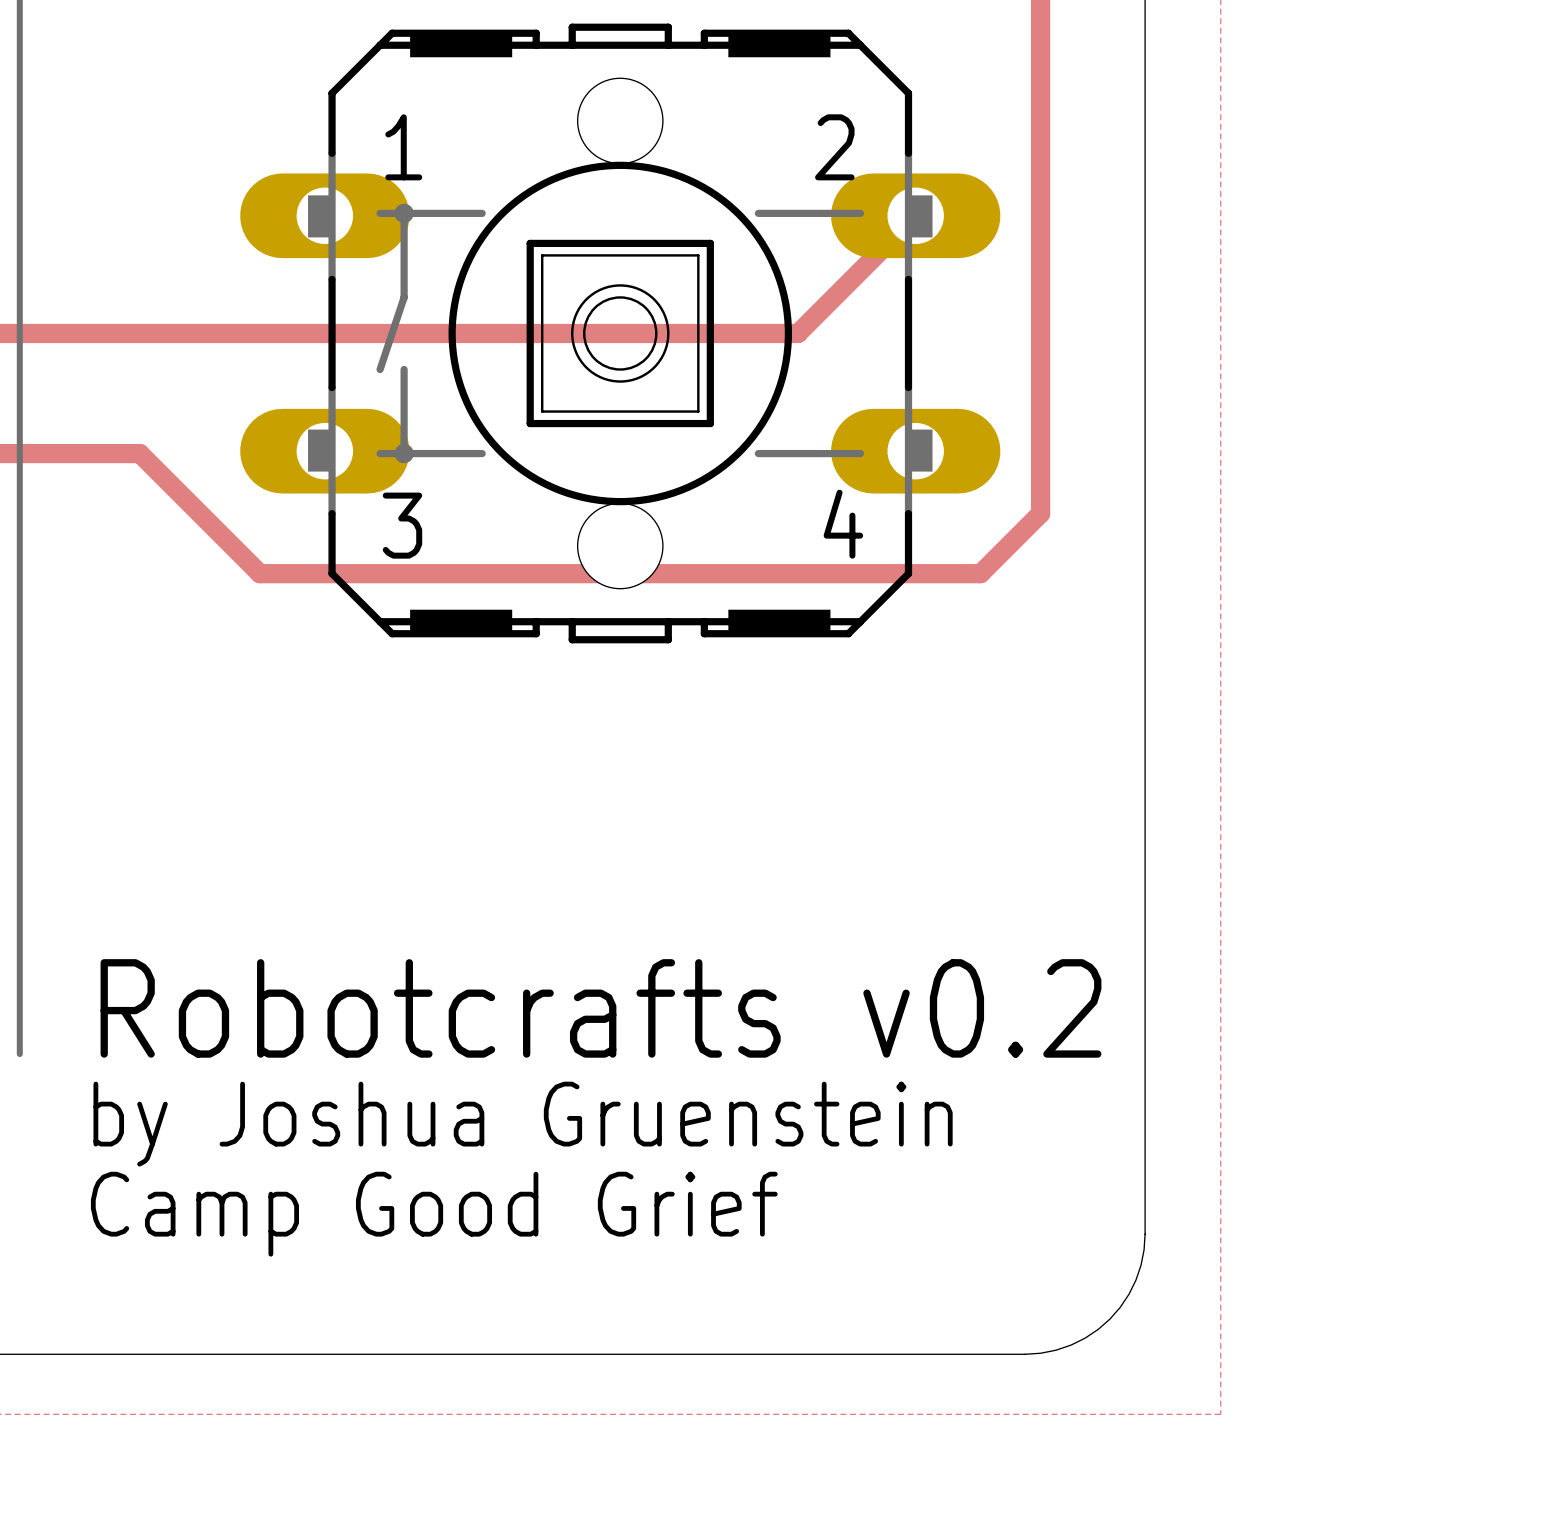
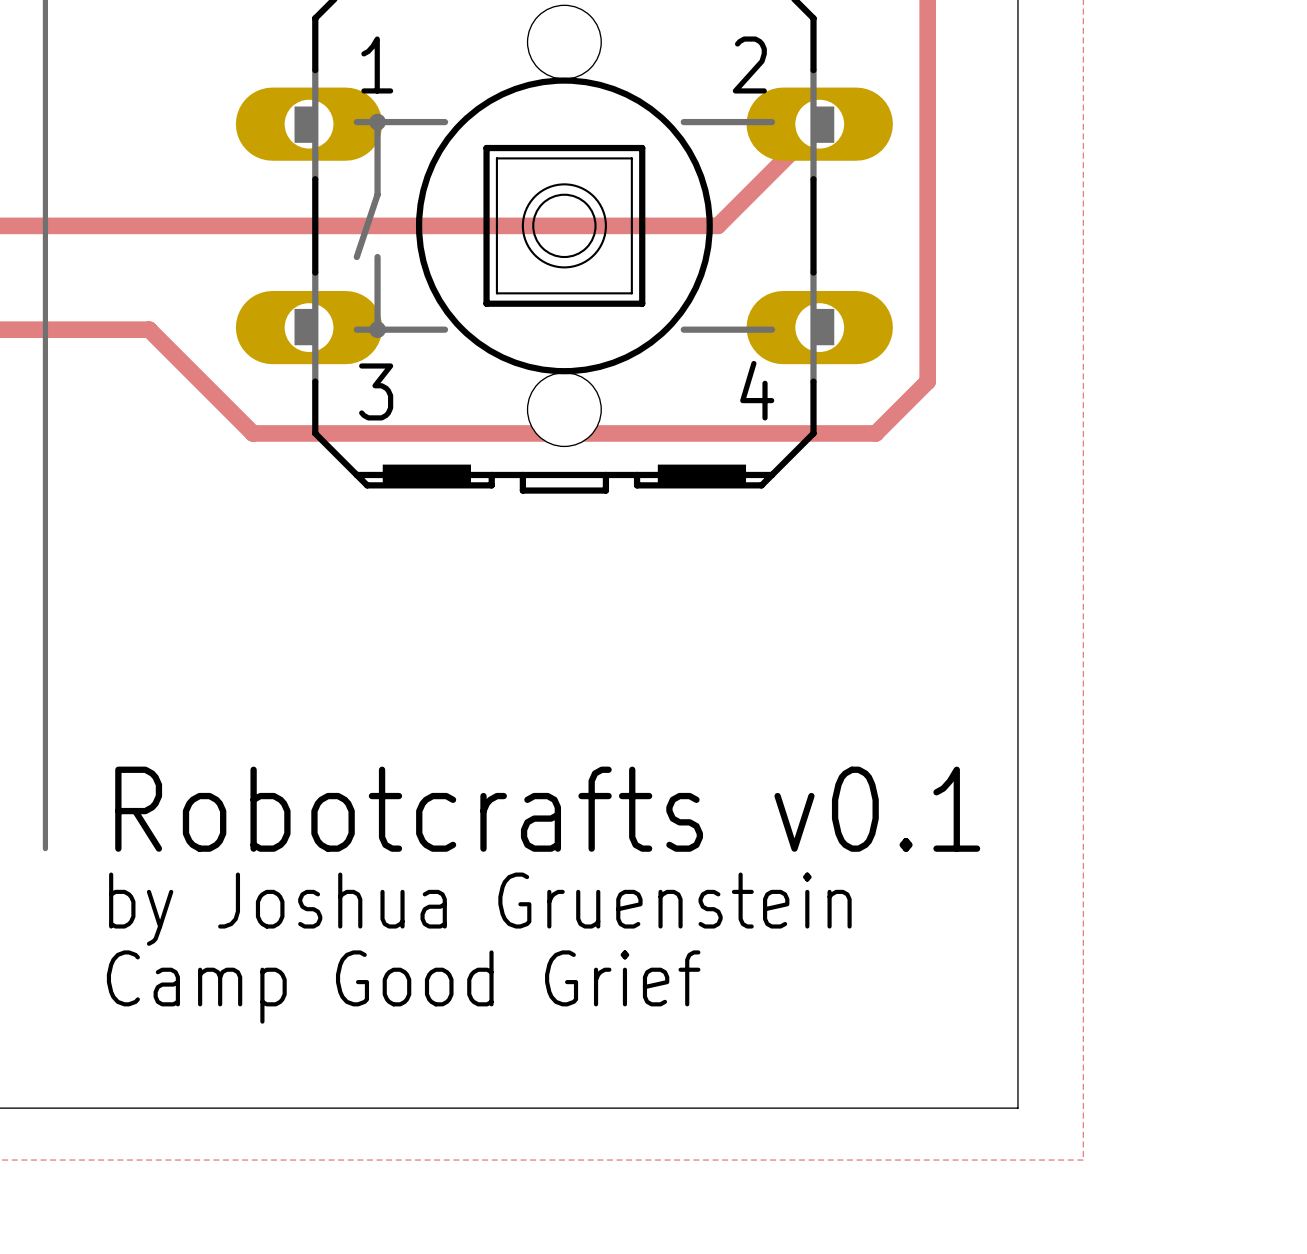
text: Robotcrafts v0.2 (600, 1008) -> Robotcrafts v0.1 (547, 809)
board edge: (1145, 1234) (1141, 1265) (1135, 1280) (1120, 1307) (1109, 1319) (1098, 1329) (1070, 1345) (1056, 1350) (1025, 1354) -> (1017, 1004) (1017, 1108) (914, 1108)

